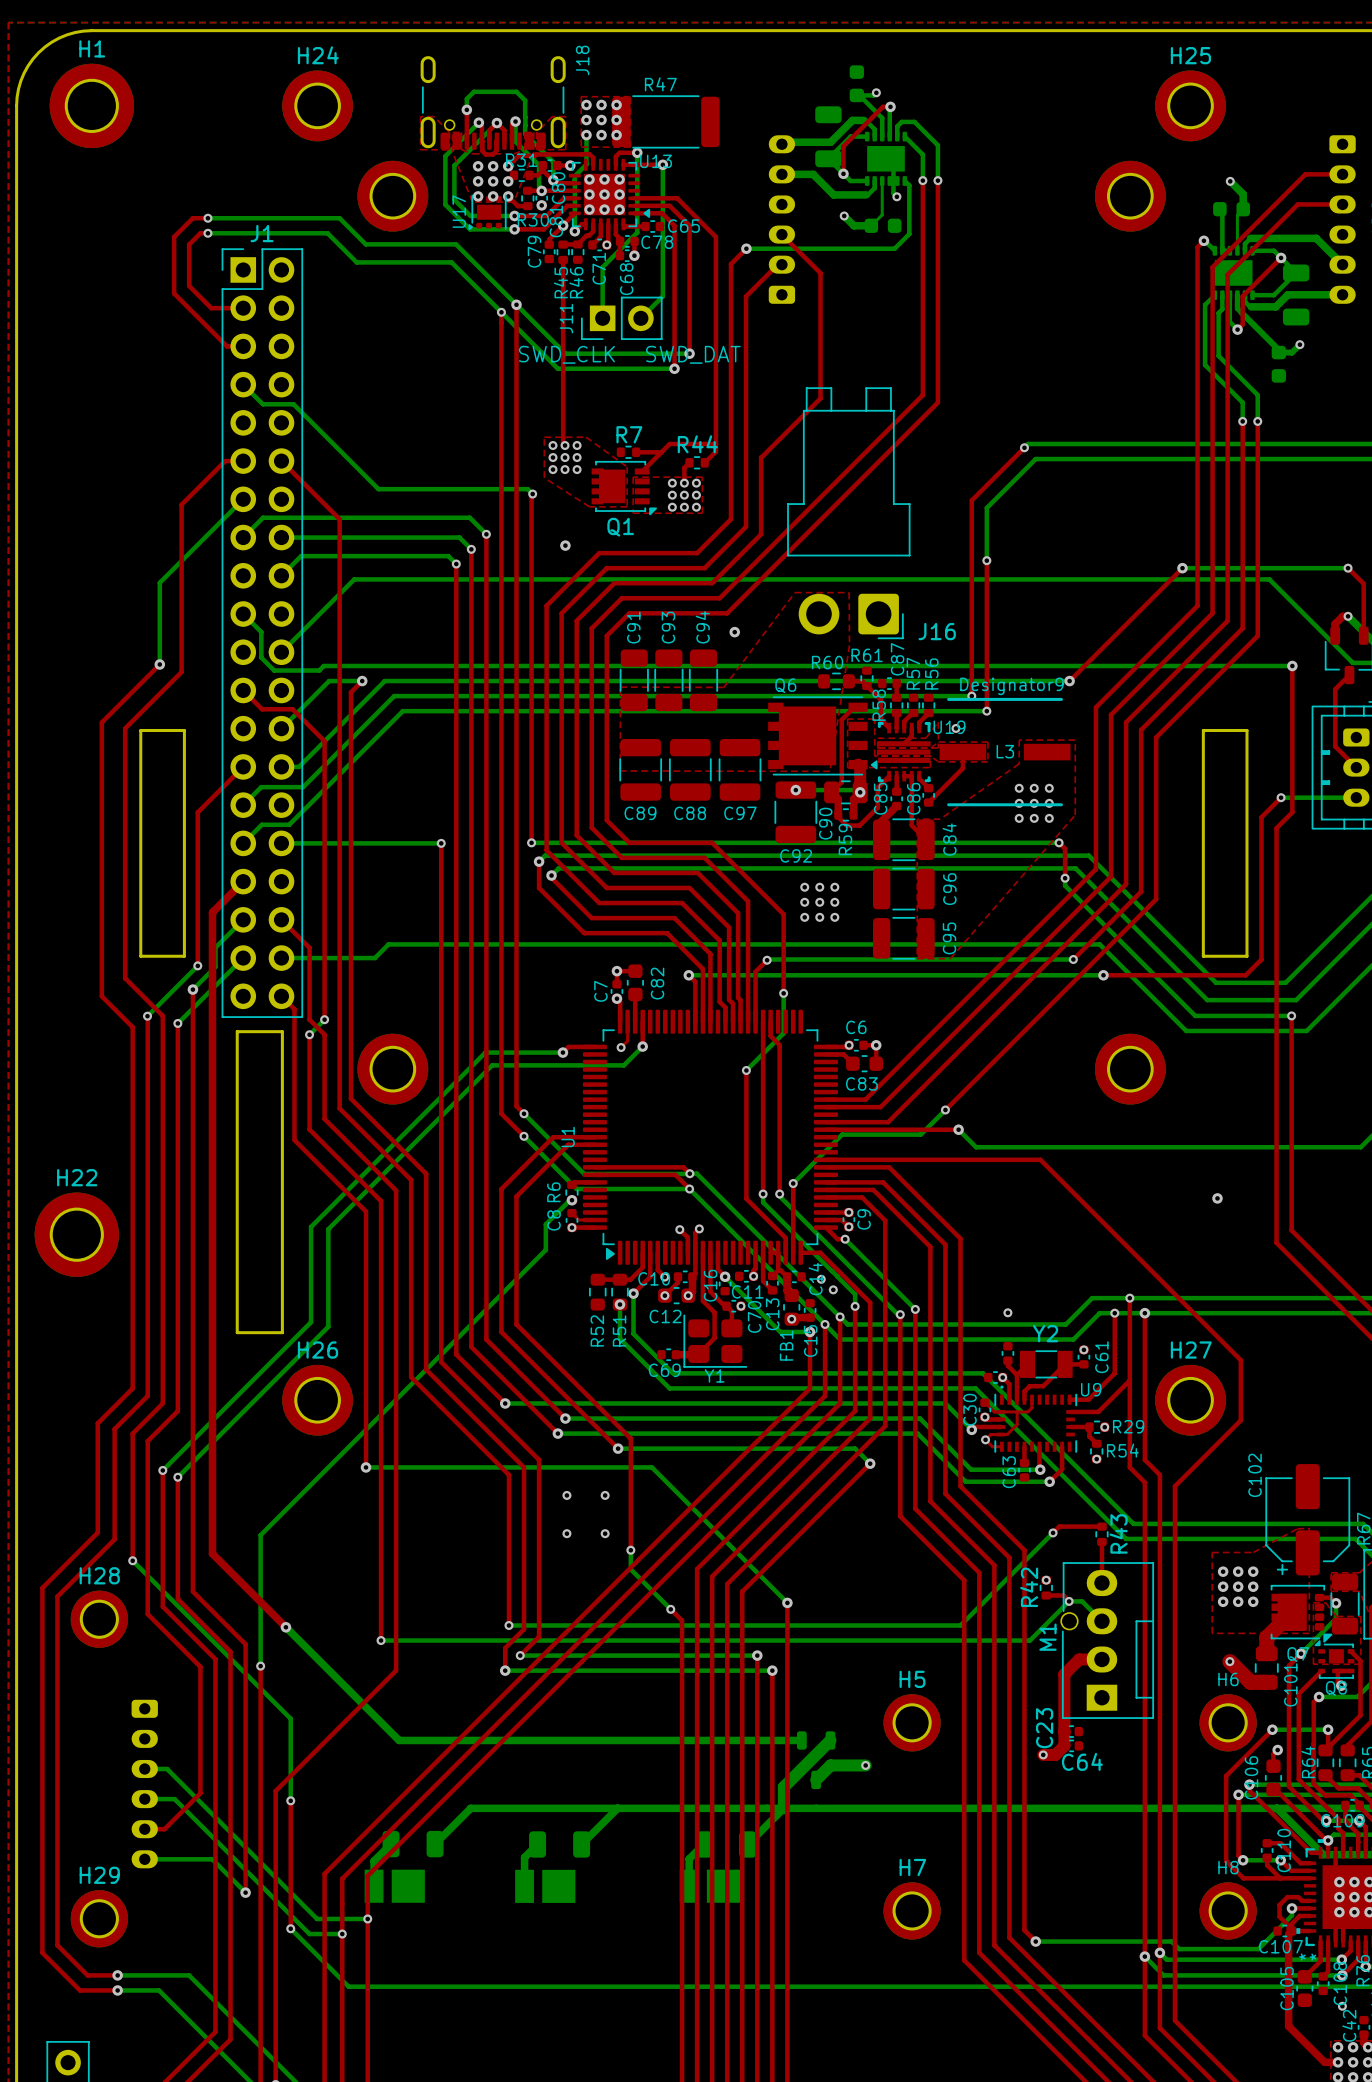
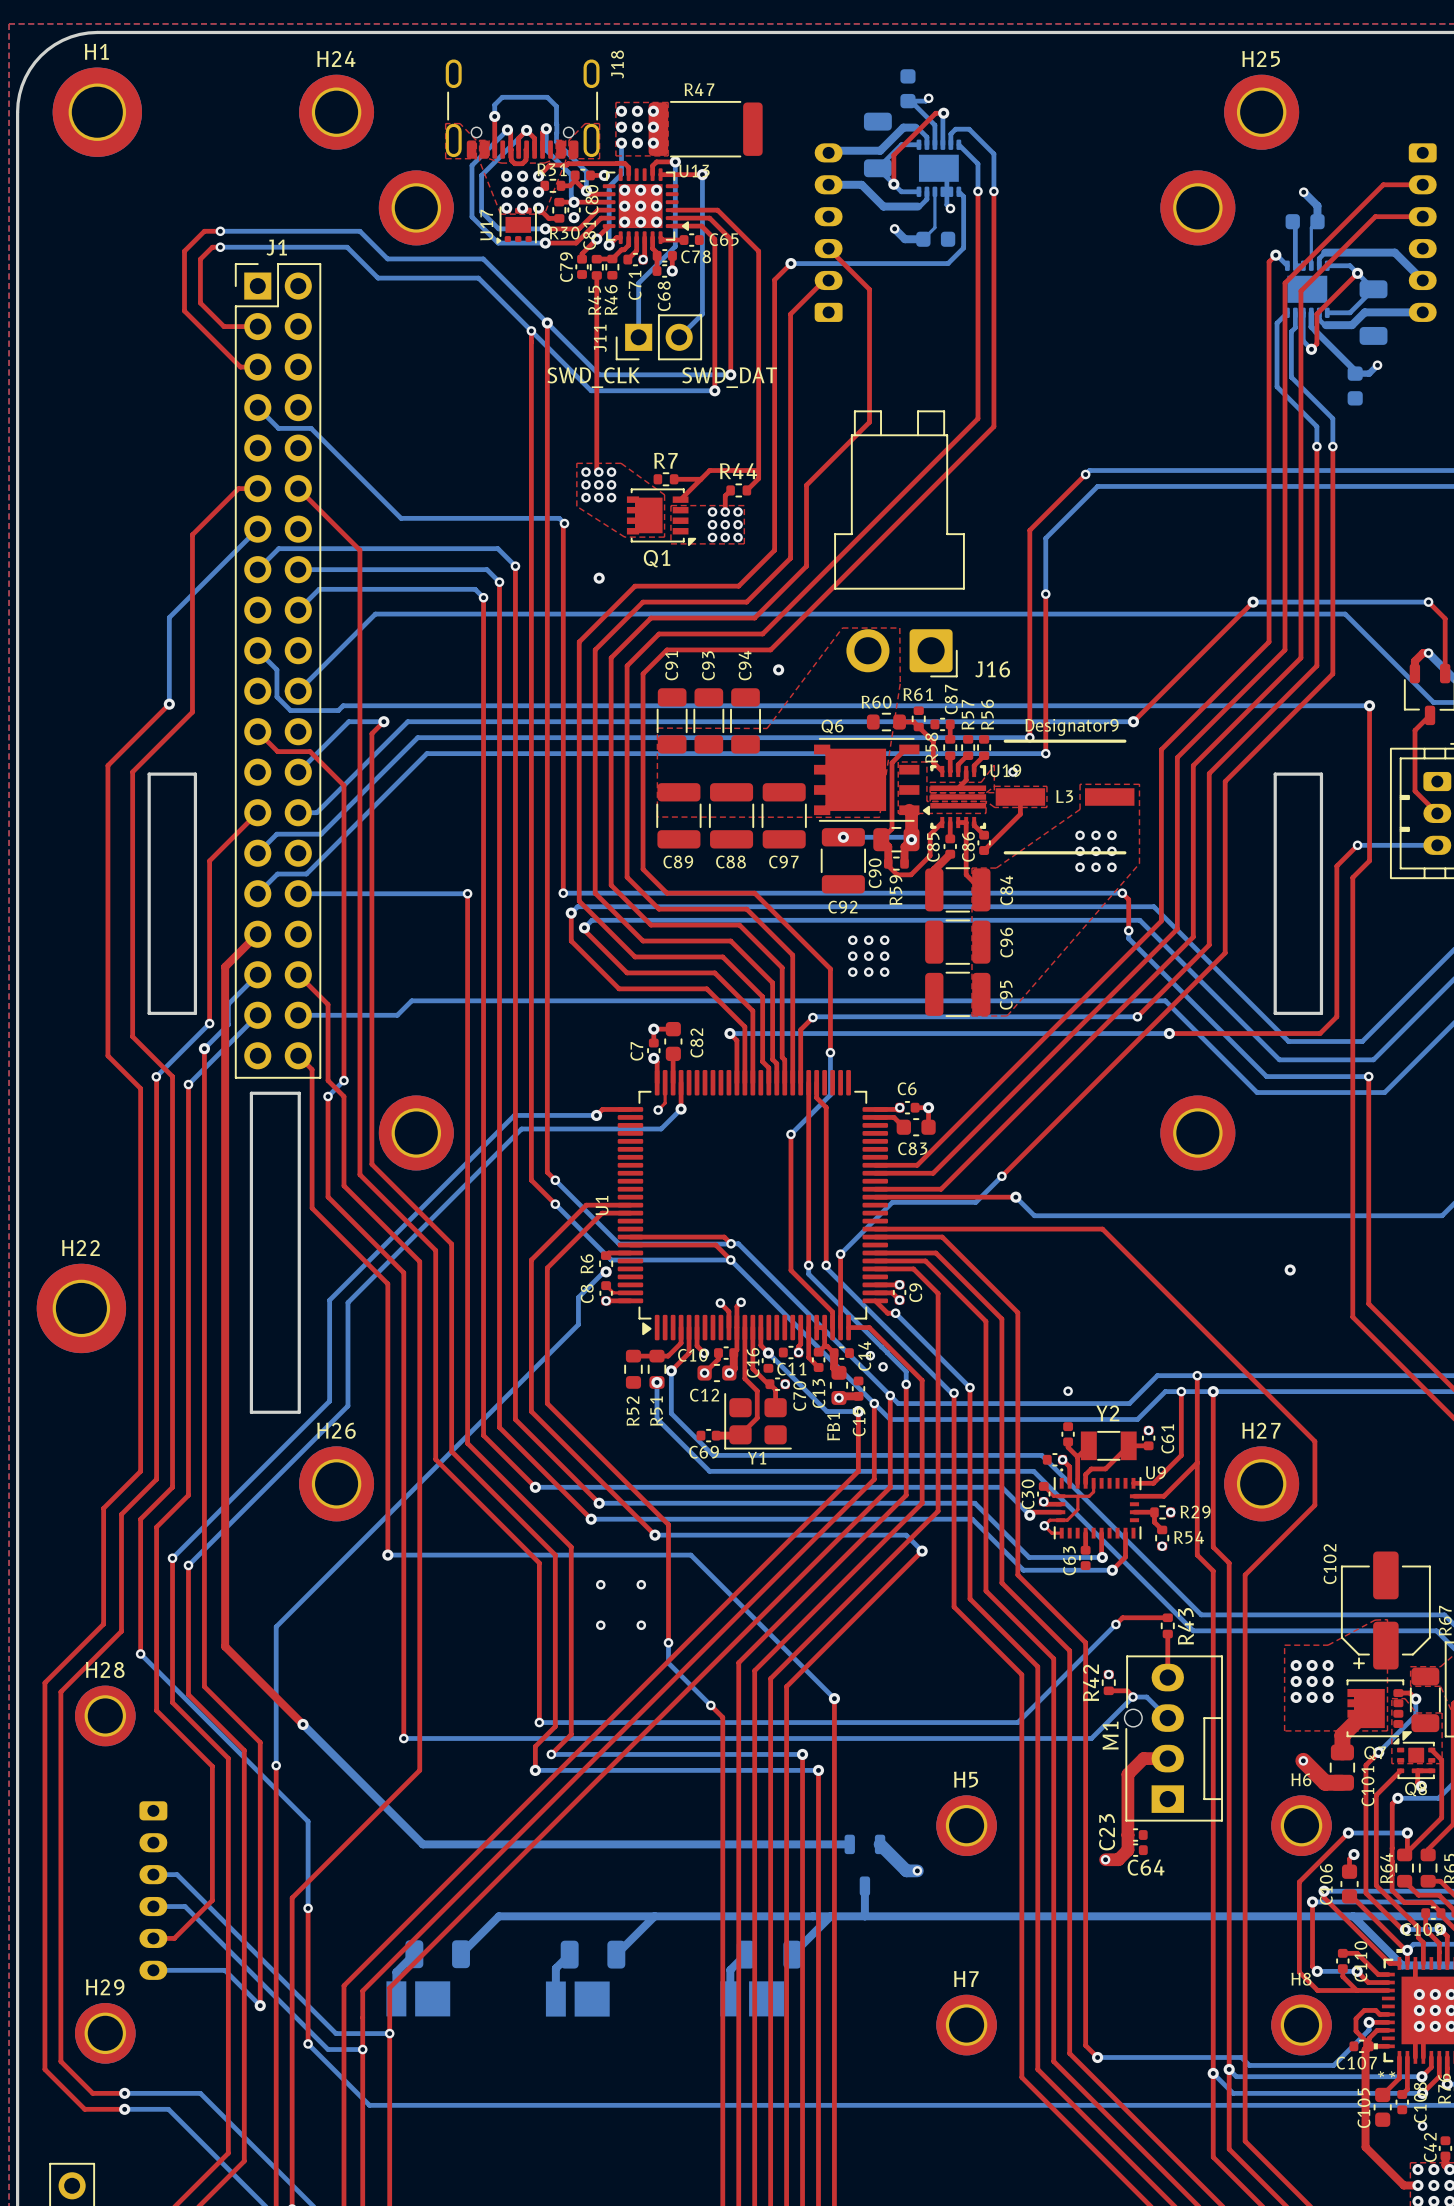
bottom track: (830, 1740) (783, 1787) (783, 1808) -> none
bottom track: (855, 1765) (830, 1765) (816, 1779) -> (906, 1870) (880, 1844)
bottom track: none -> (864, 1886) (864, 1916)

